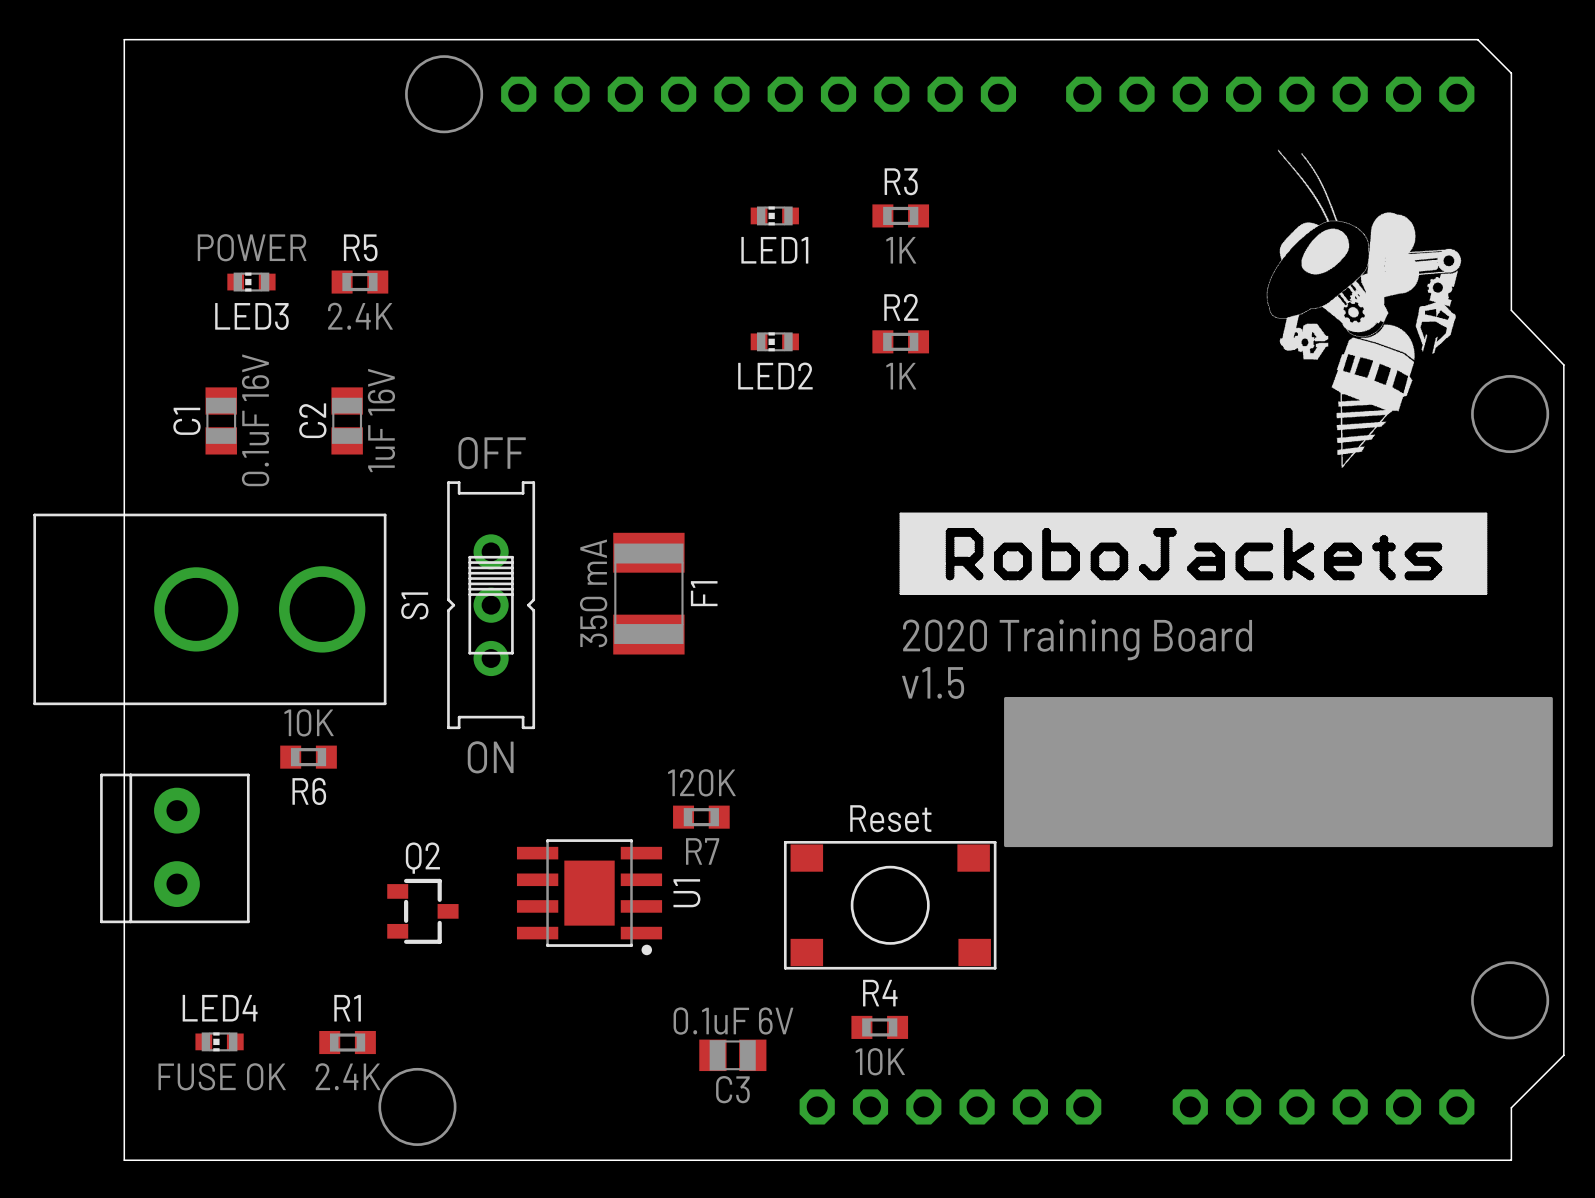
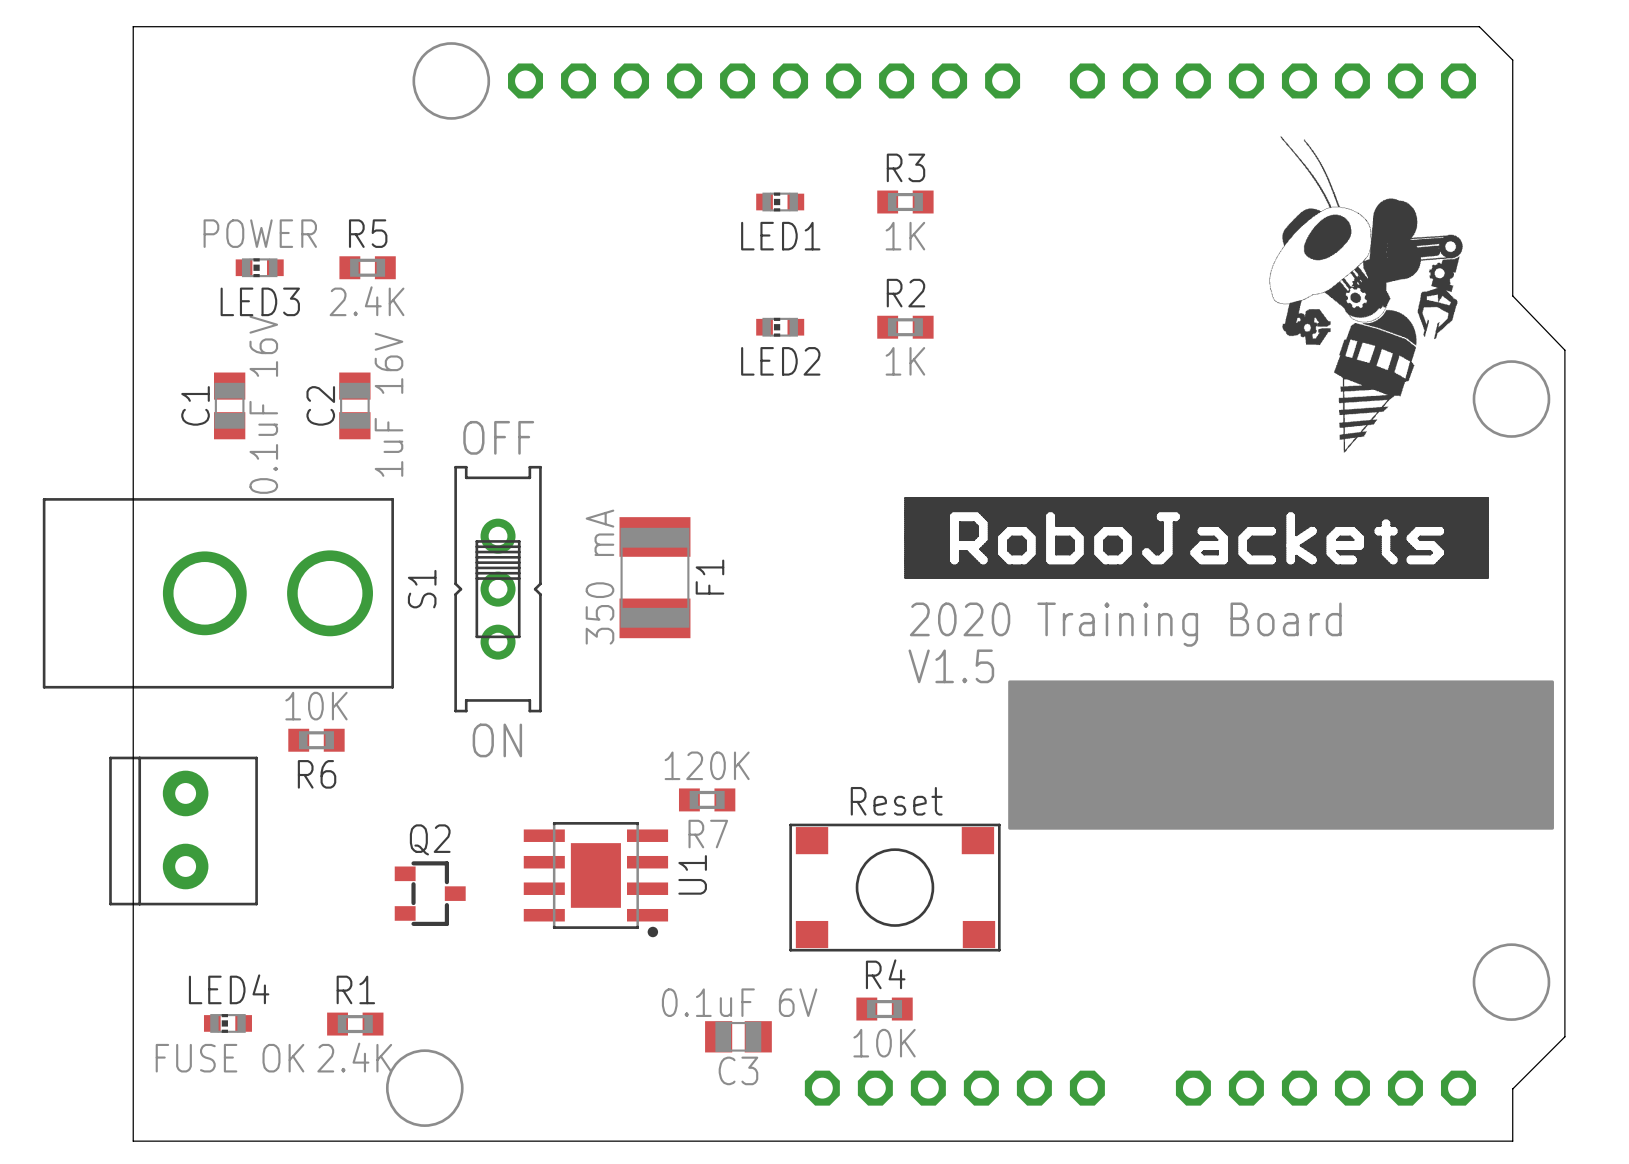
text: v1.5 (933, 683) -> V1.5 (951, 666)

